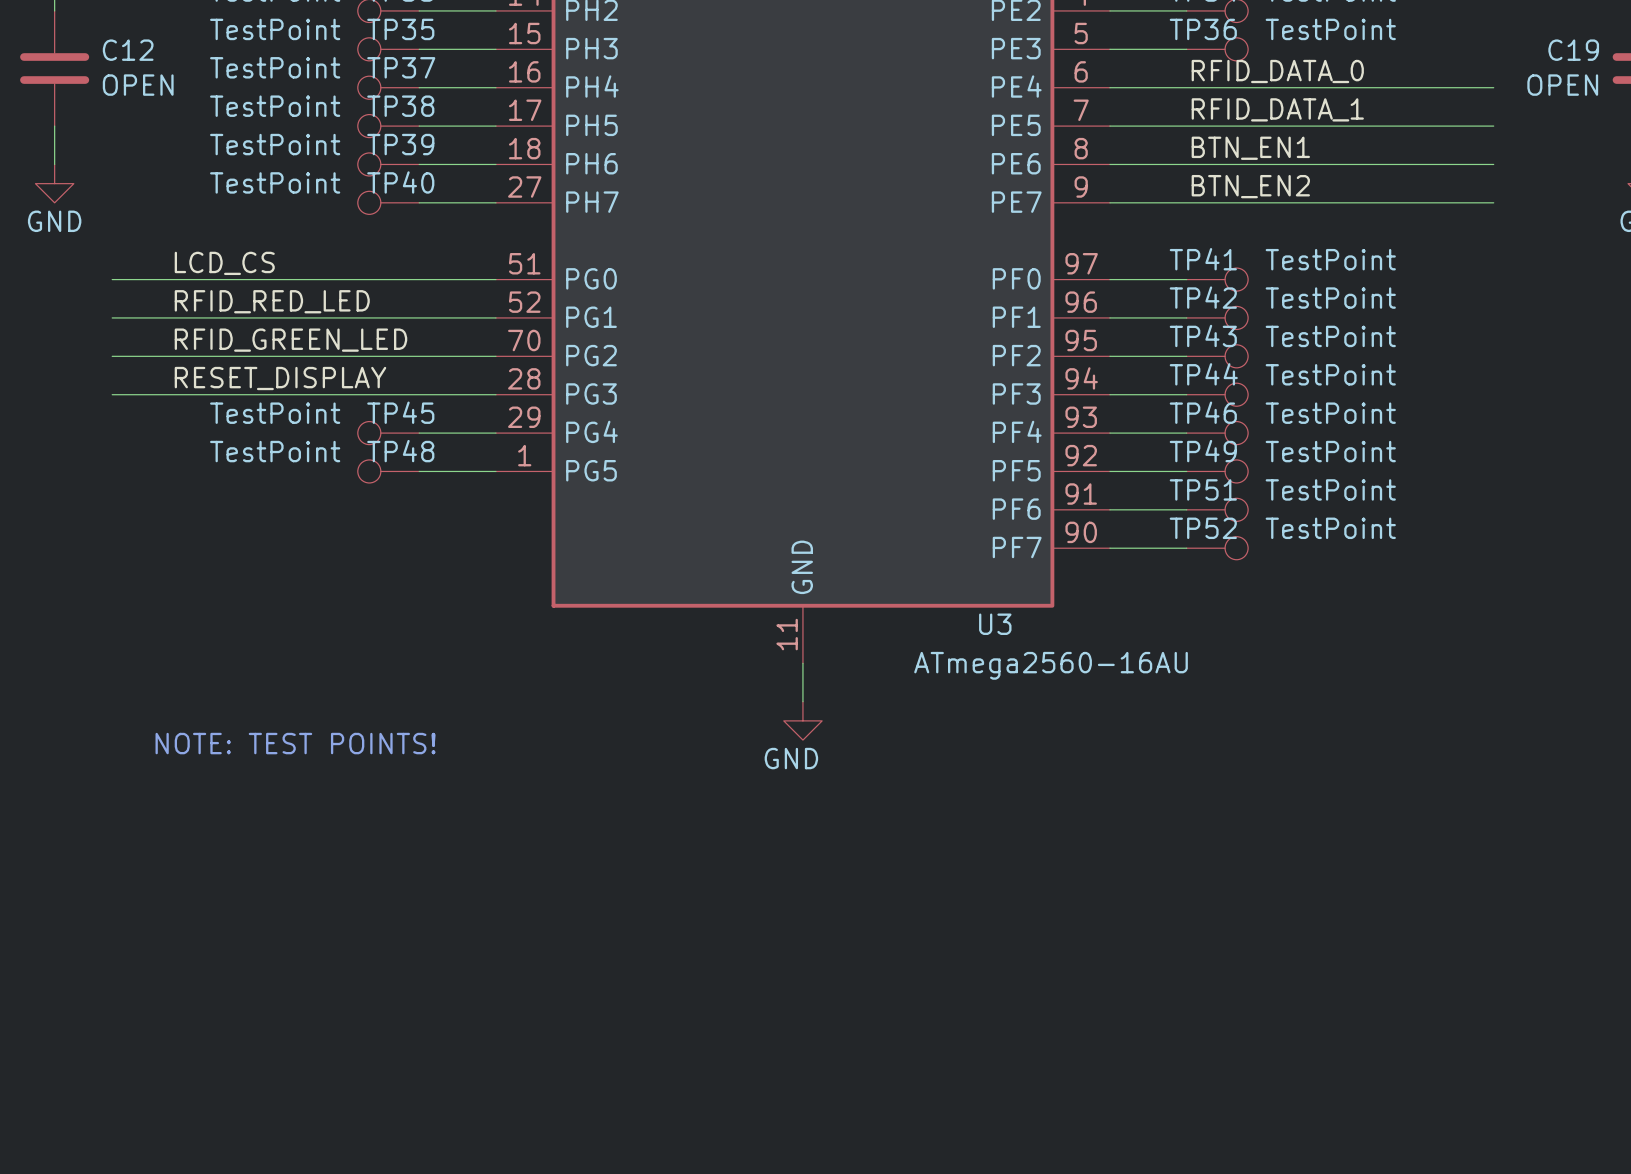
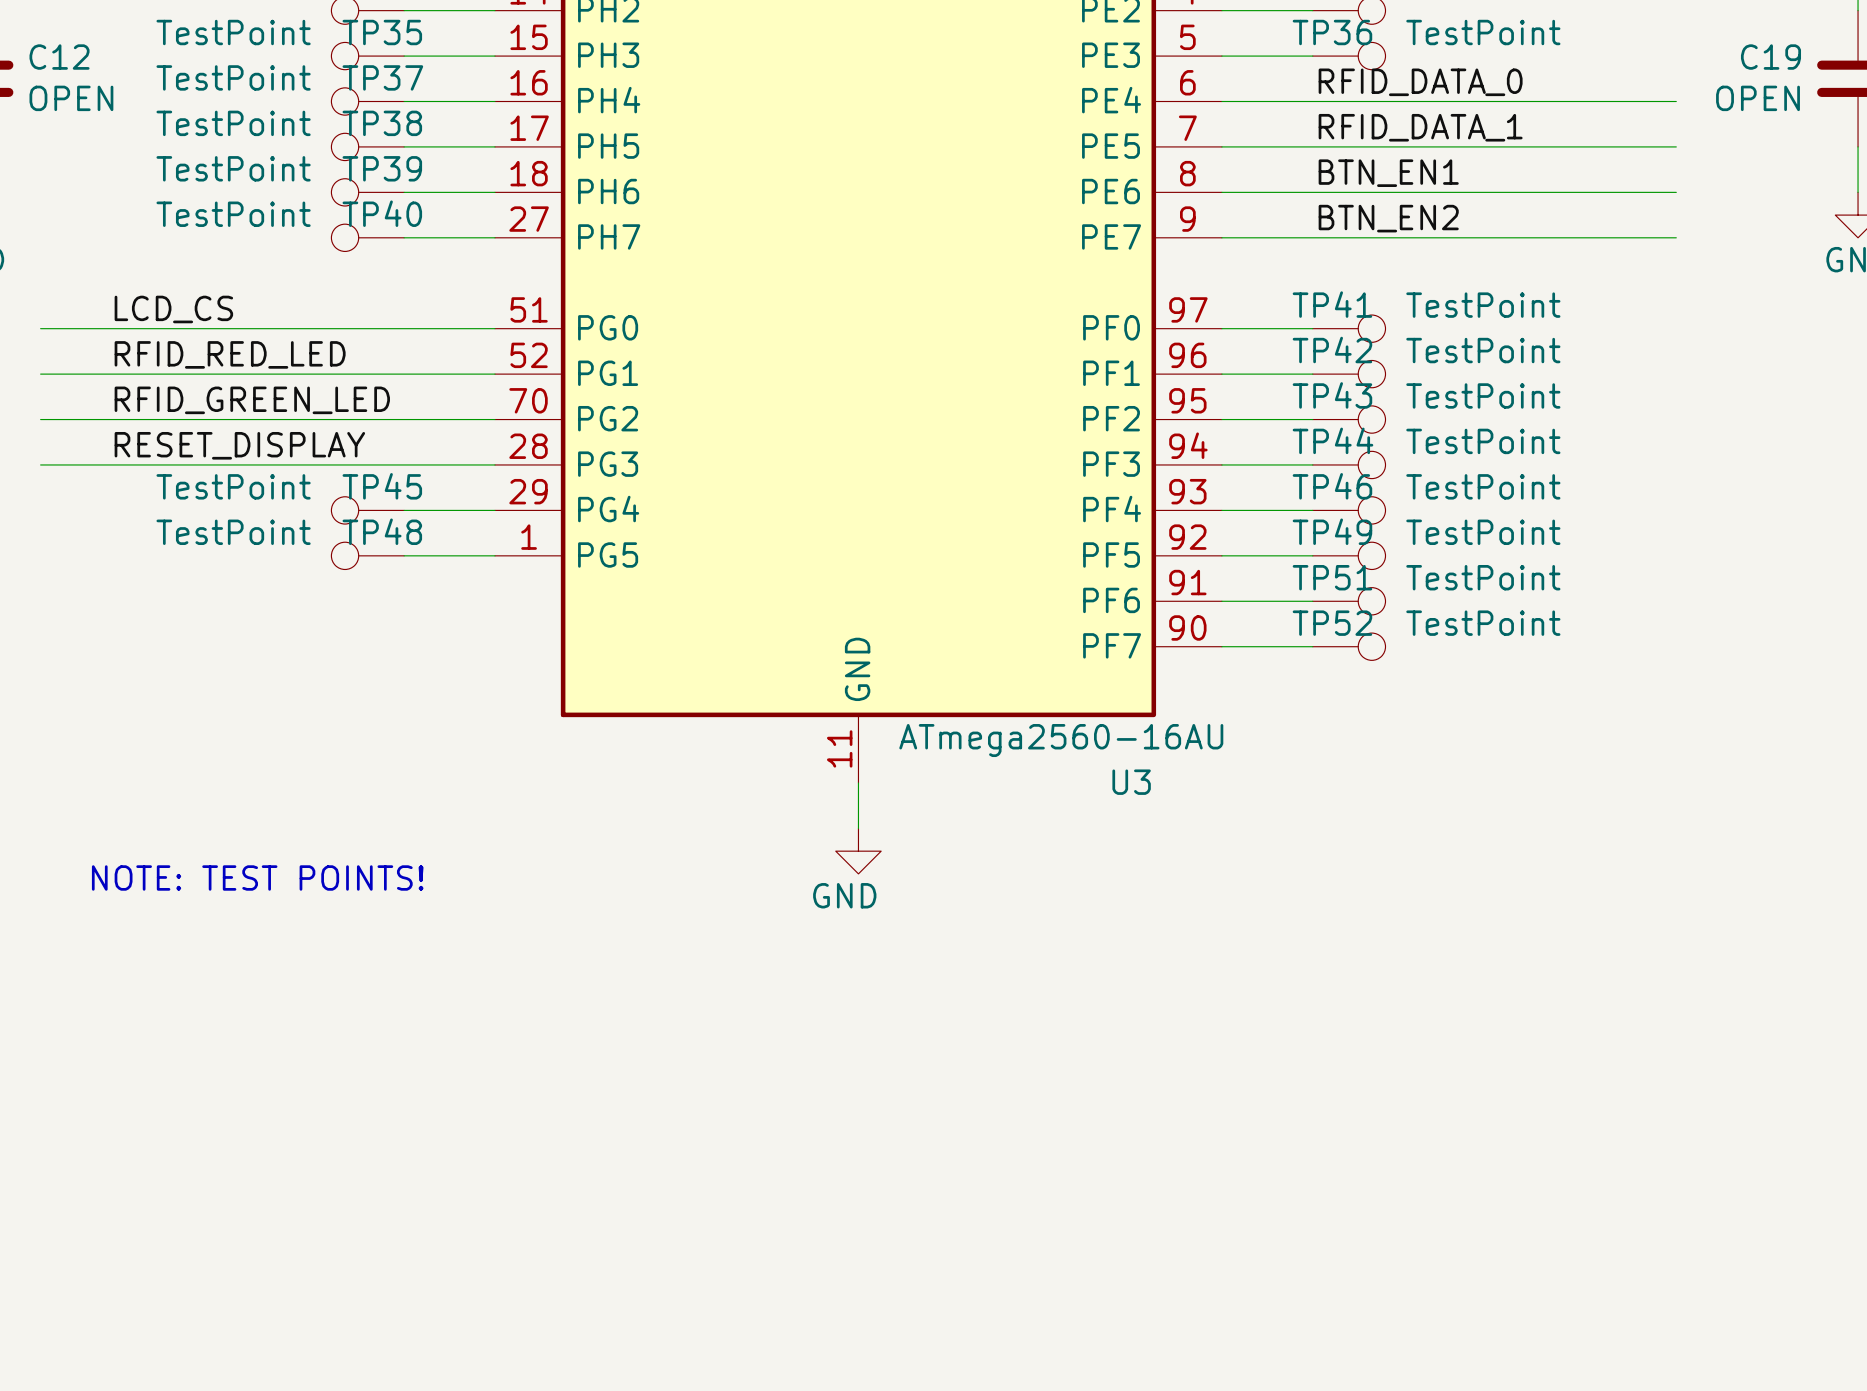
U3 name position: U3 (995, 624) -> U3 (1131, 782)
U3 value position: ATmega2560-16AU (1051, 665) -> ATmega2560-16AU (1061, 740)

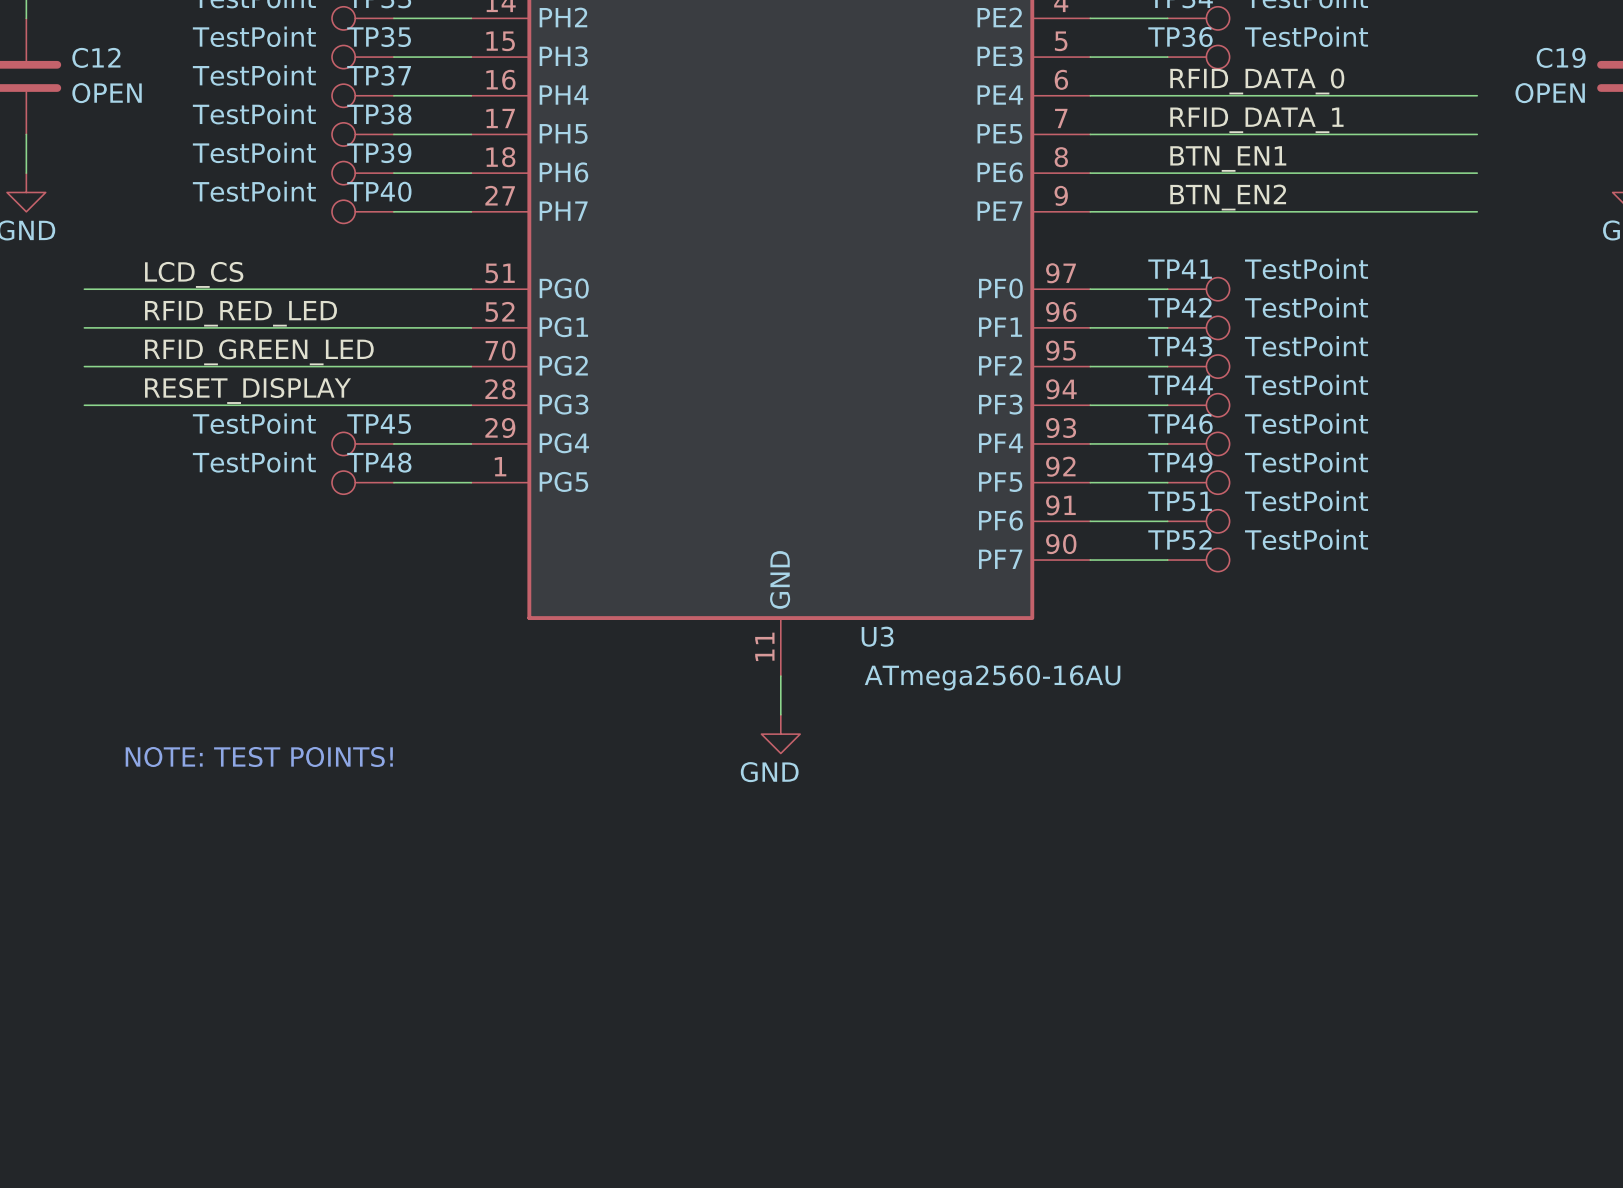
U3 value position: ATmega2560-16AU (1061, 740) -> ATmega2560-16AU (992, 677)
U3 name position: U3 (1131, 782) -> U3 (877, 636)

